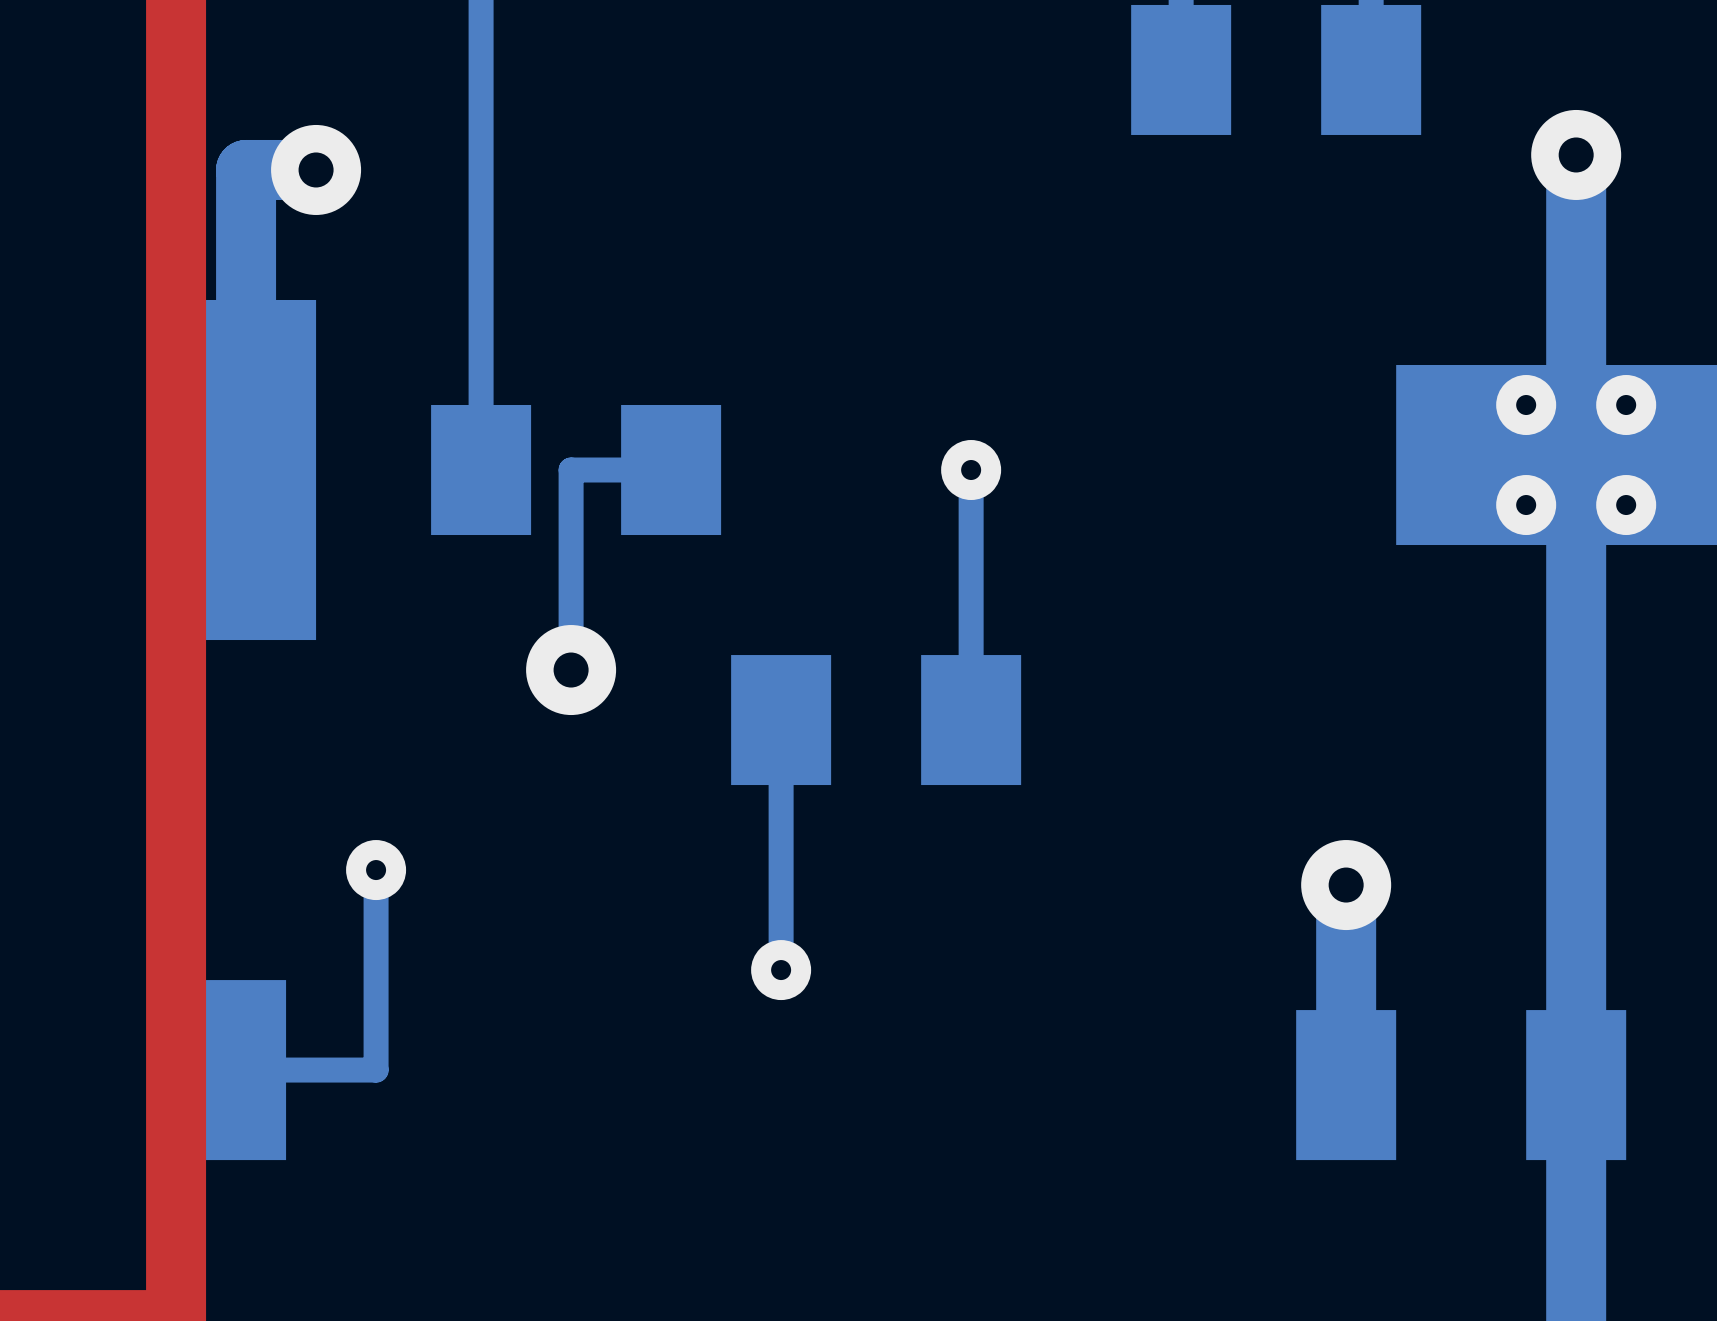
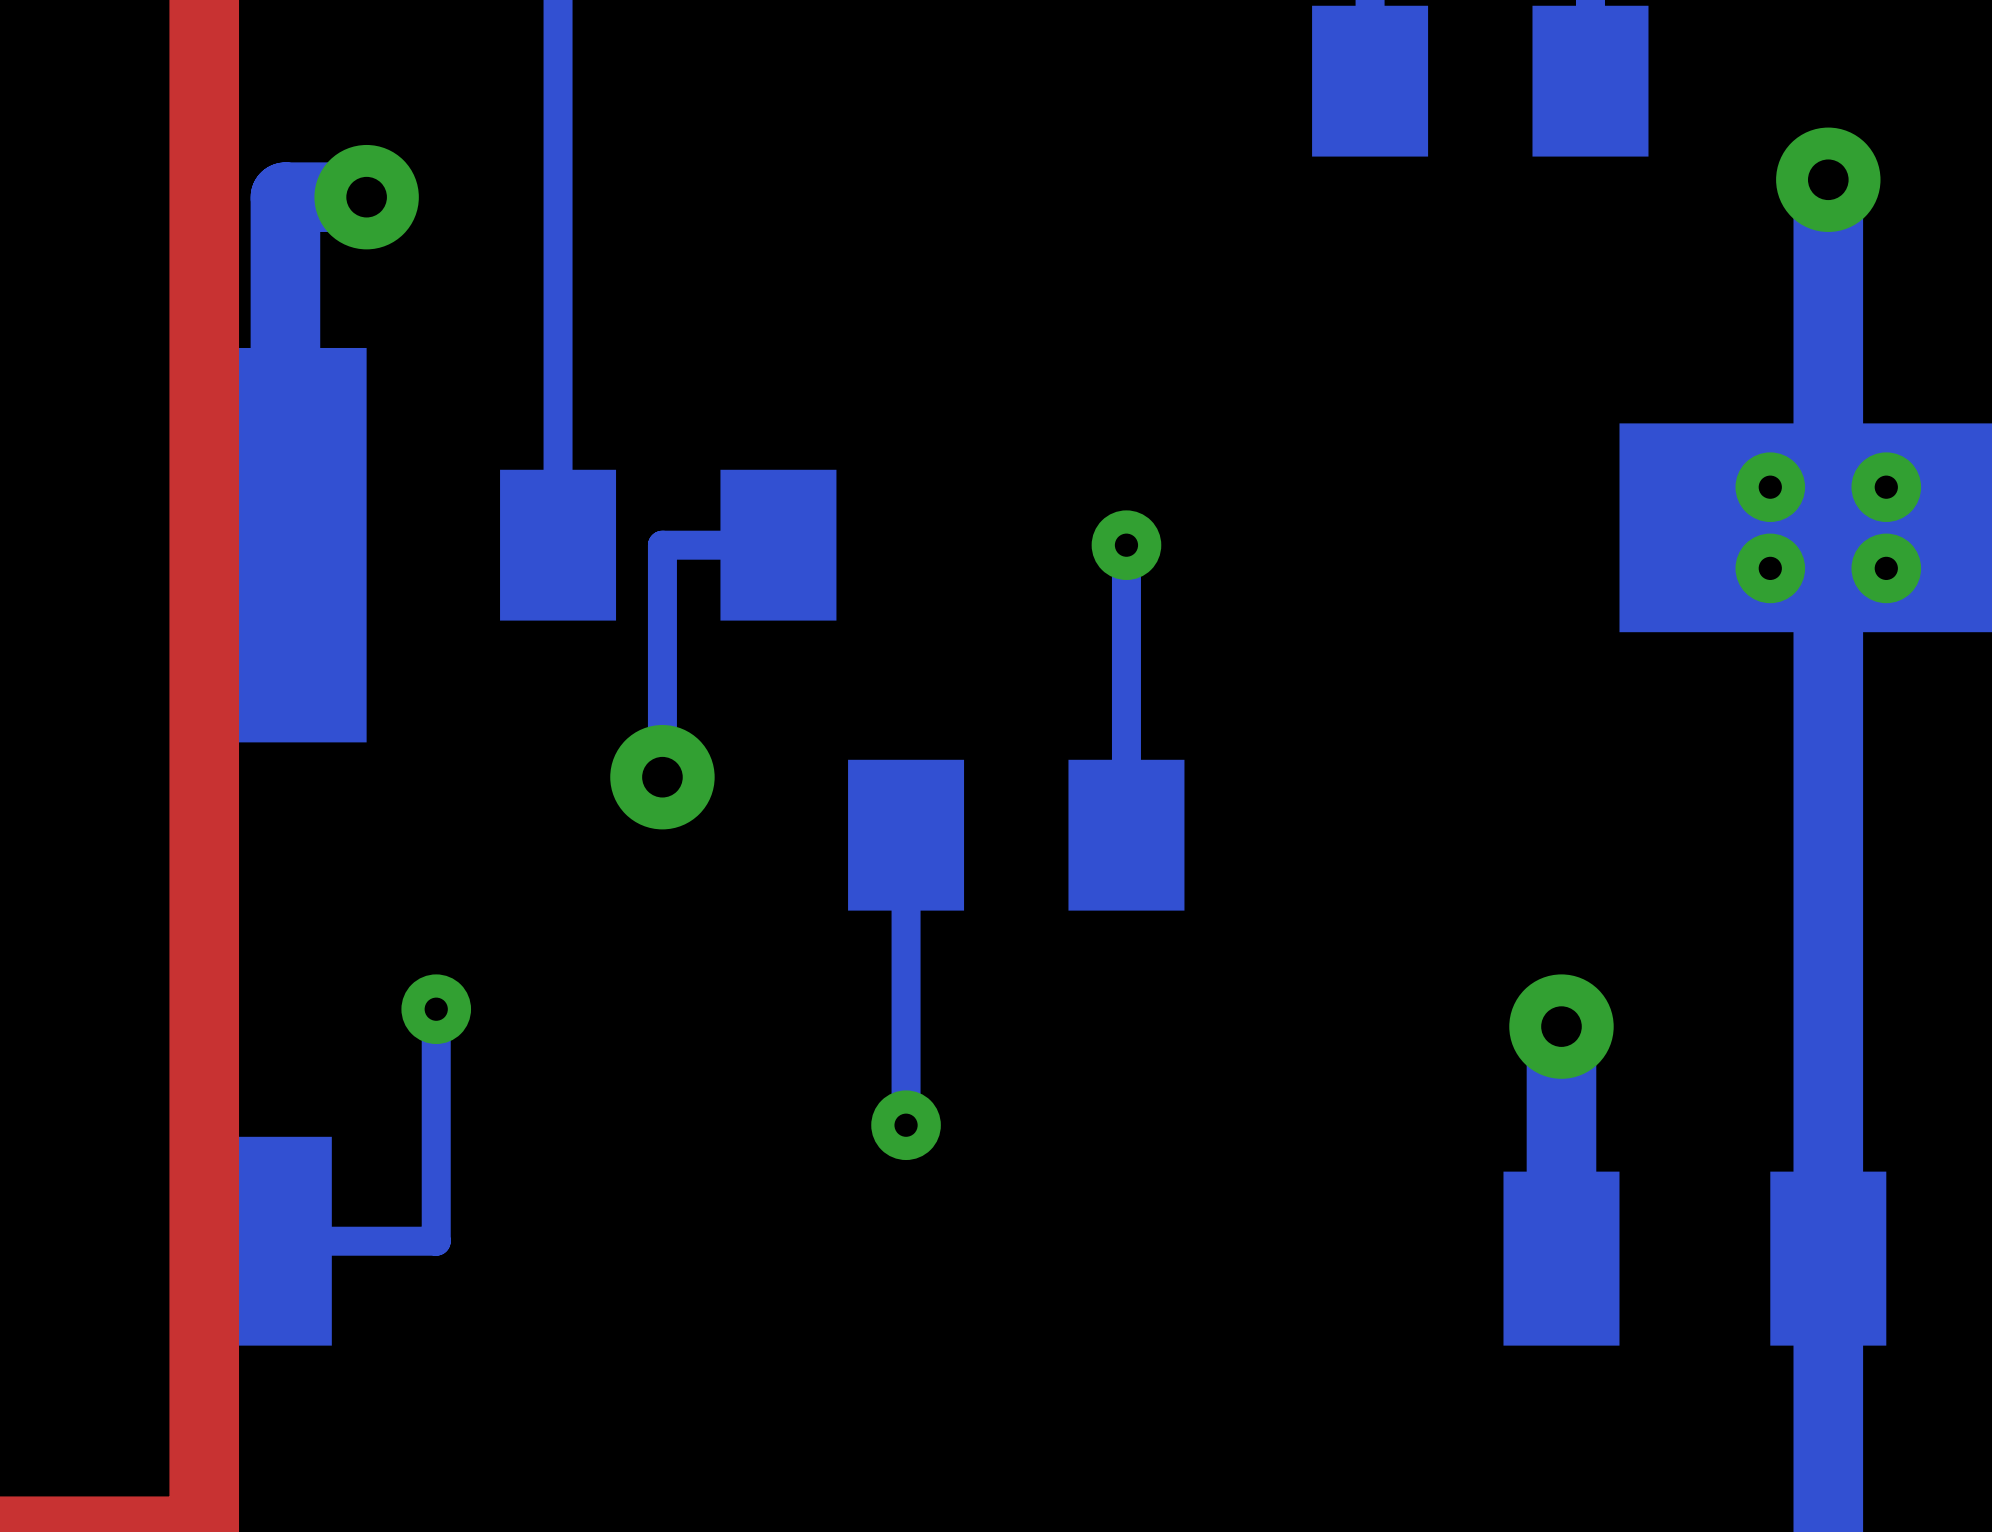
via position: (1526, 405) -> (1770, 487)
via position: (1626, 405) -> (1886, 487)
via position: (1526, 505) -> (1770, 568)
via position: (1626, 505) -> (1886, 568)

